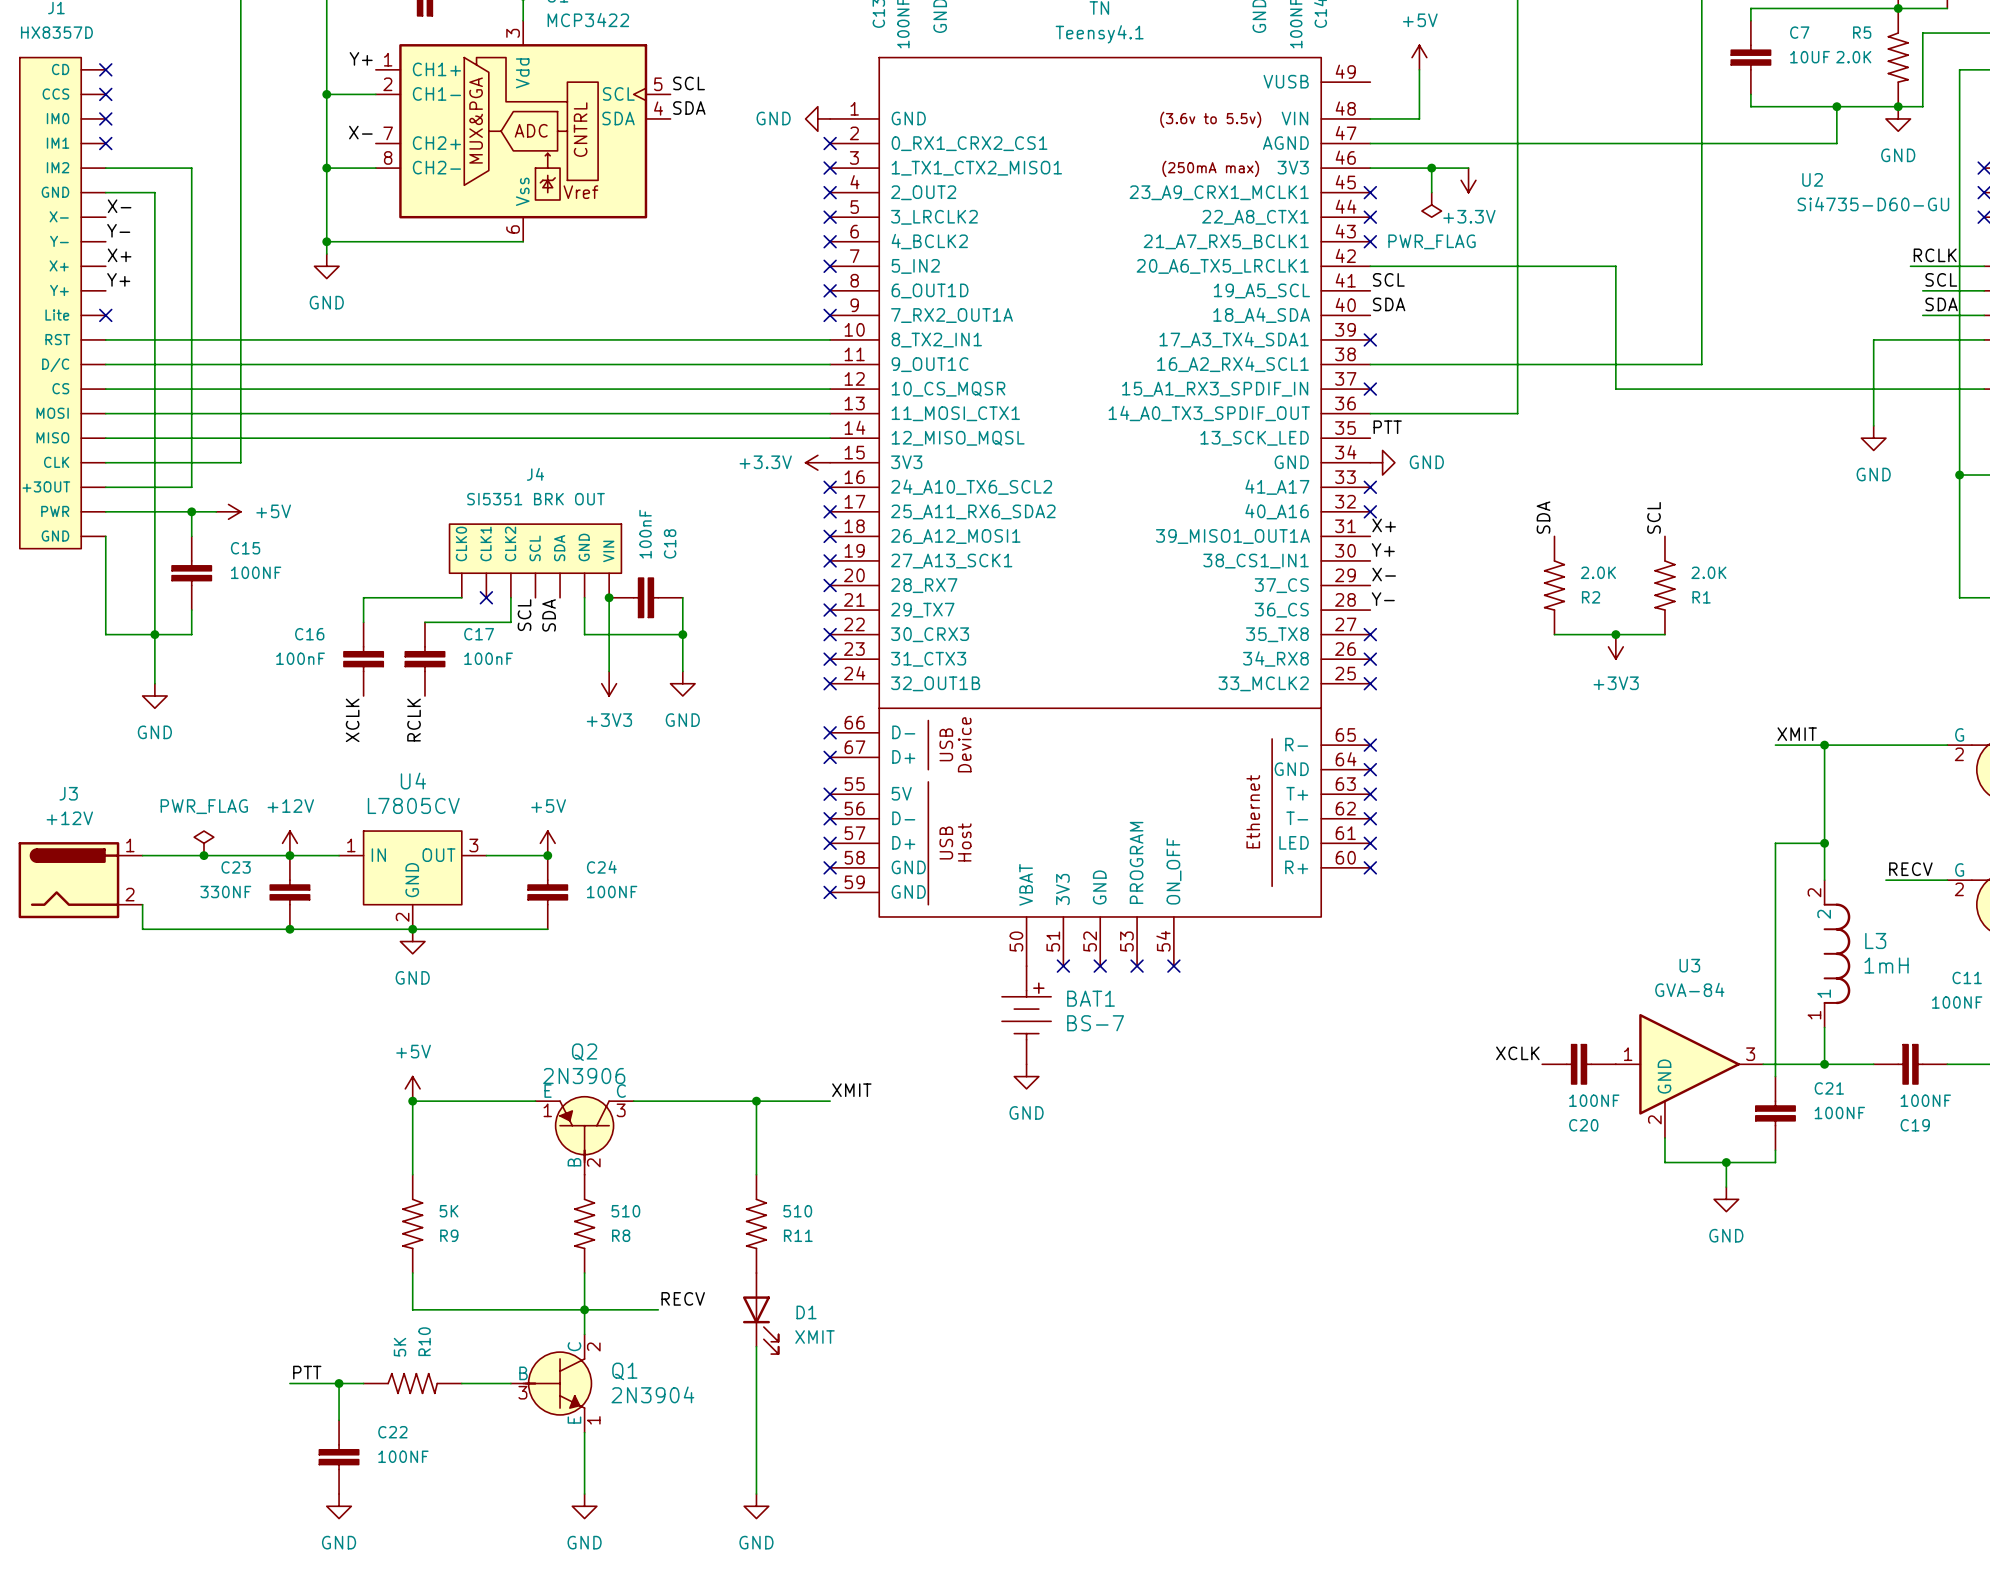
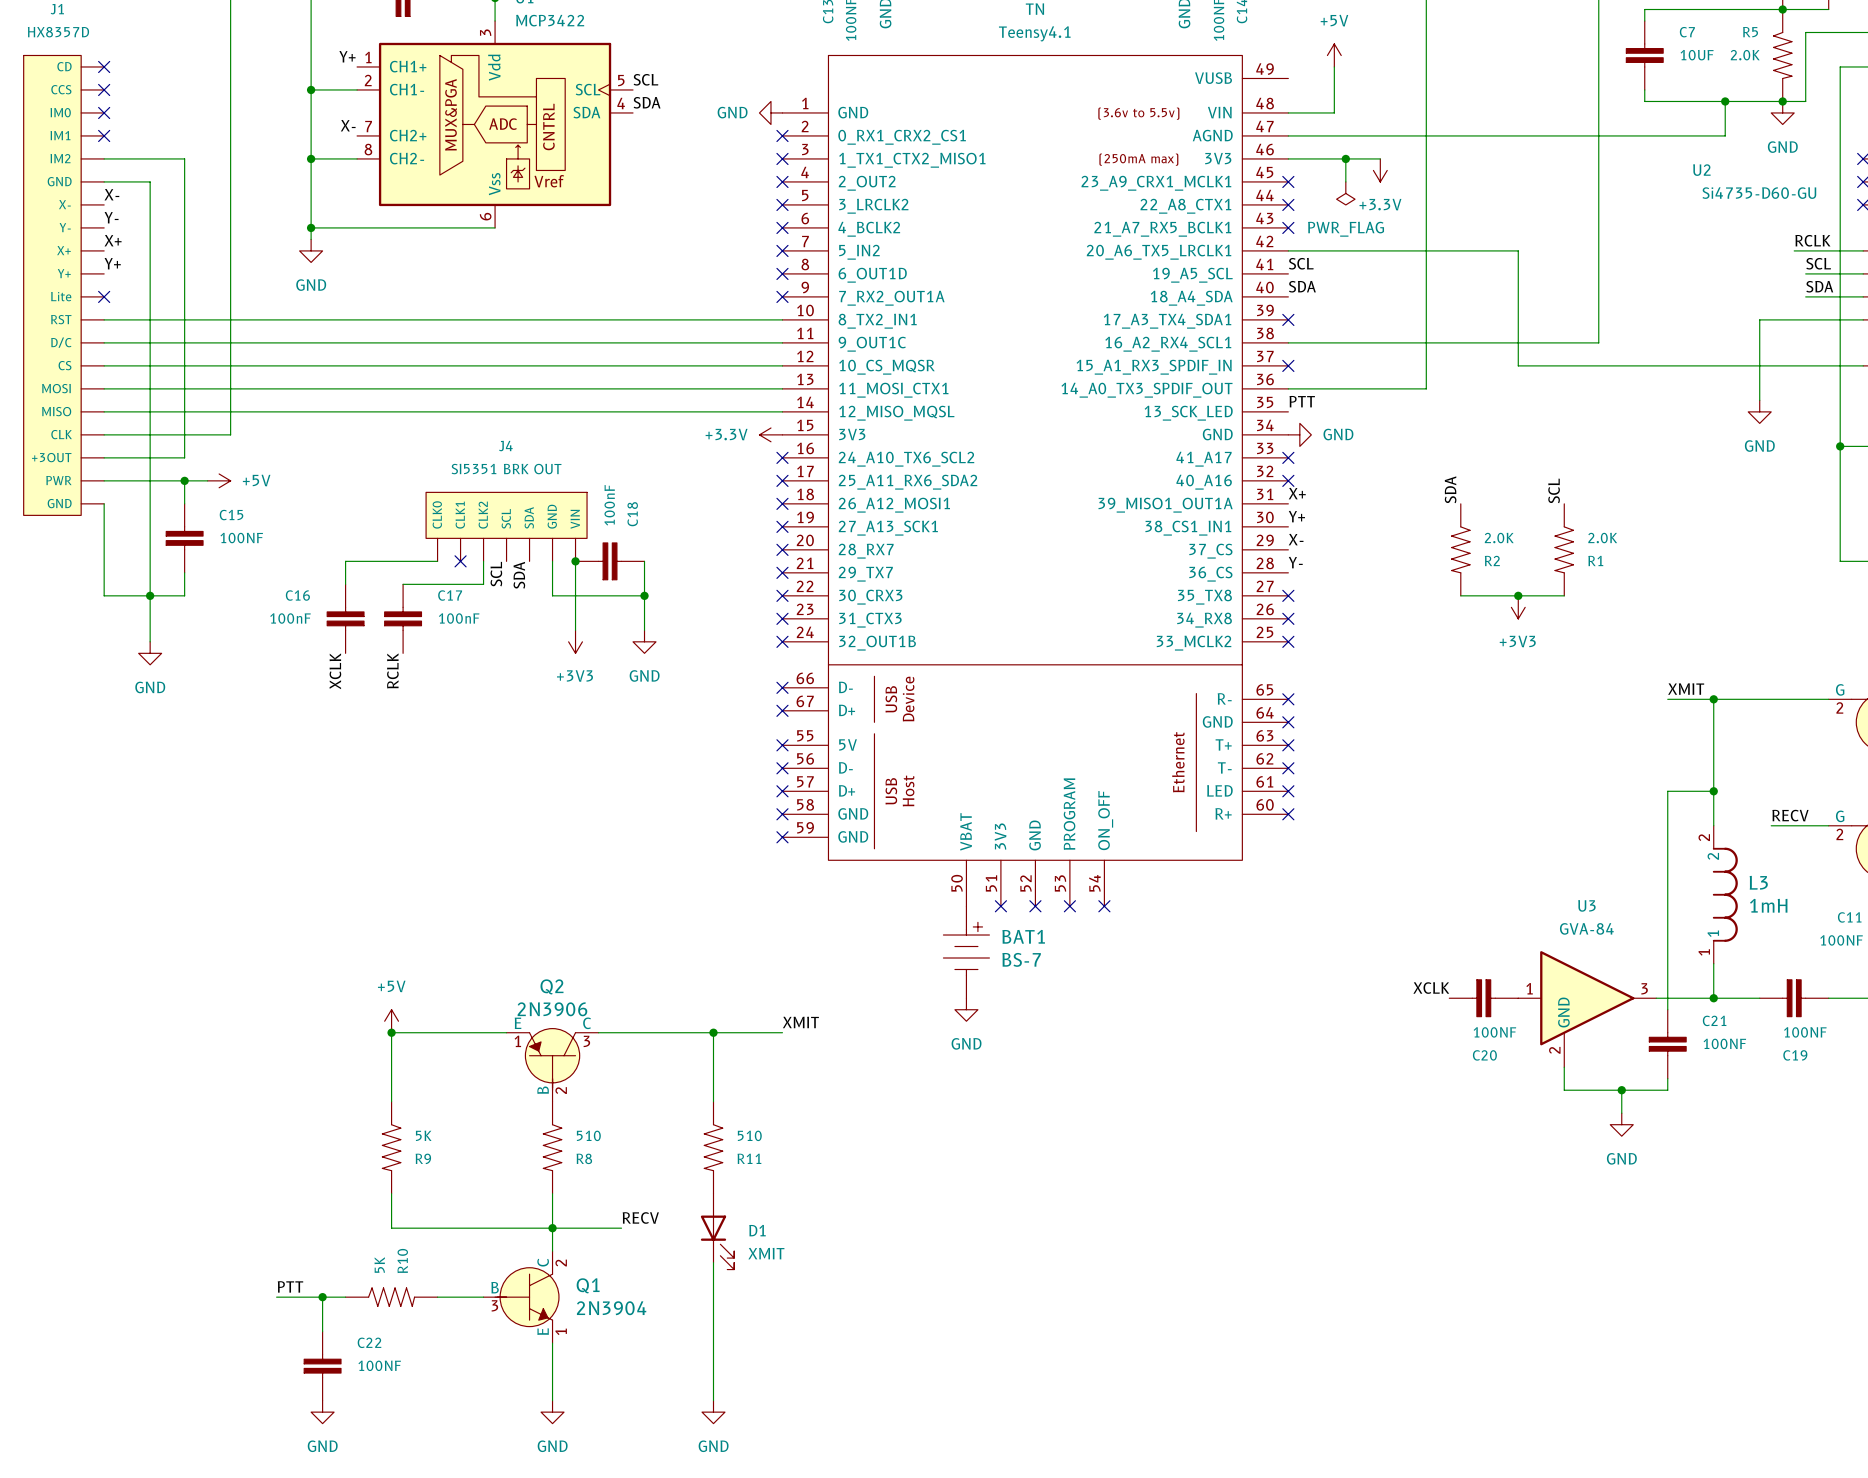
power symbol: PWR_FLAG (203, 843) -> none
power symbol: +12V (289, 843) -> none
power symbol: +5V (547, 843) -> none
wire: (142, 855) (339, 855) -> none
junction: (203, 855) -> none
junction: (289, 855) -> none
wire: (486, 855) (547, 855) -> none
junction: (547, 855) -> none
J3: +12V (80, 880) -> none
U4: L7805CV (412, 880) -> none
C23: 330NF (289, 892) -> none
C24: 100NF (547, 892) -> none
wire: (142, 904) (142, 929) (547, 929) -> none
junction: (289, 929) -> none
junction: (412, 929) -> none
power symbol: GND (412, 941) -> none

